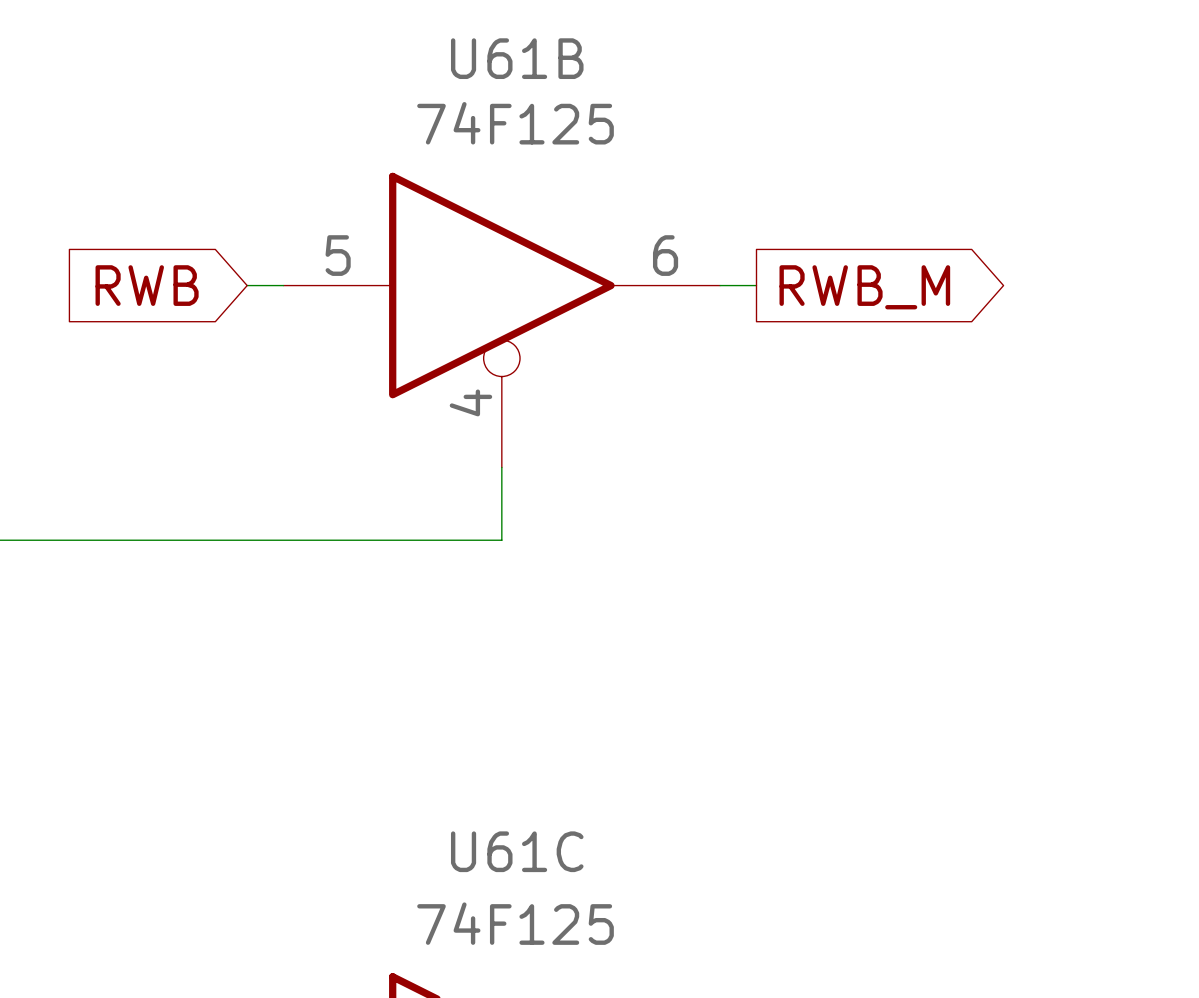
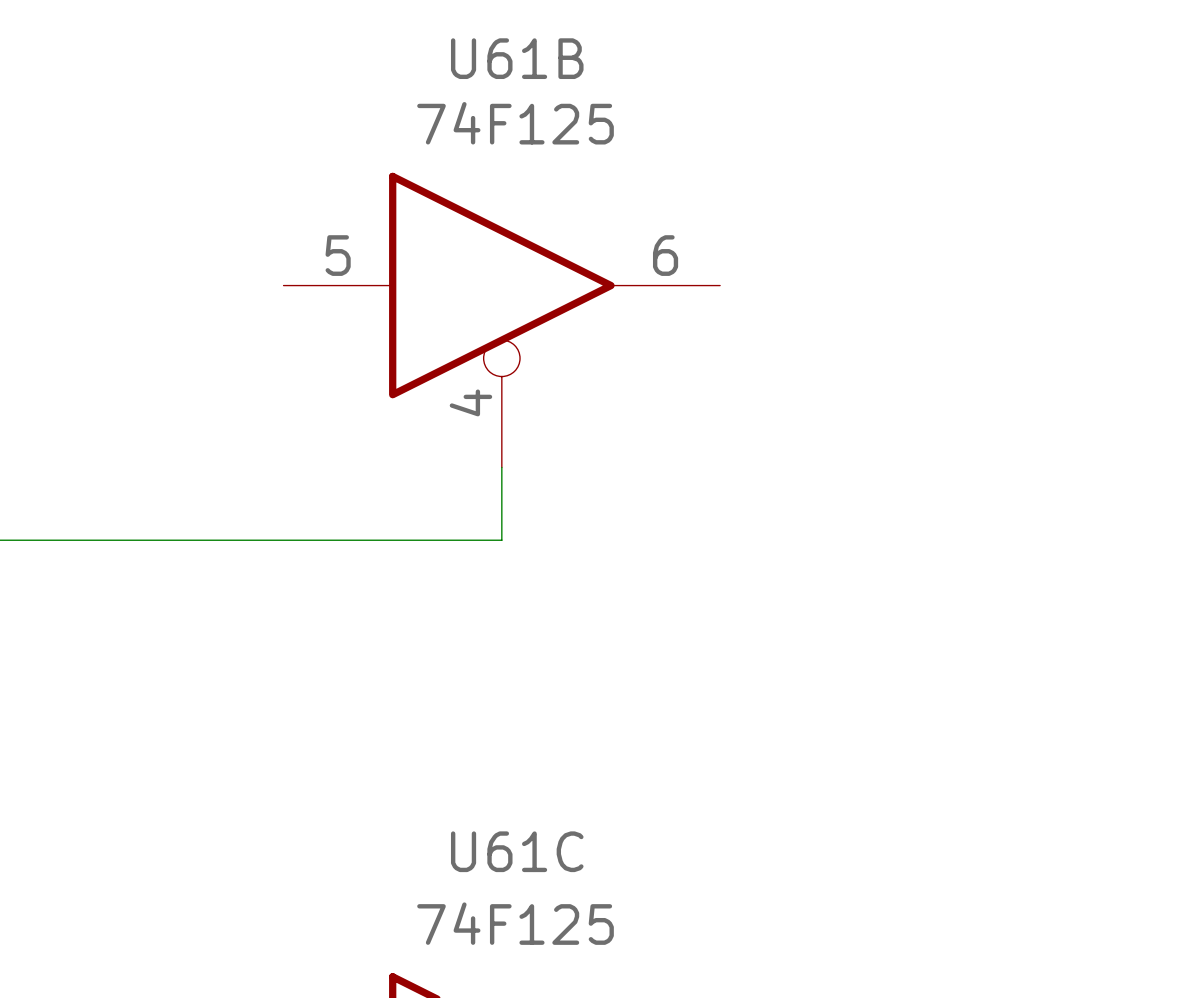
global label: RWB (147, 285) -> none
wire: (247, 285) (283, 285) -> none
wire: (720, 285) (756, 285) -> none
global label: RWB_M (864, 287) -> none

